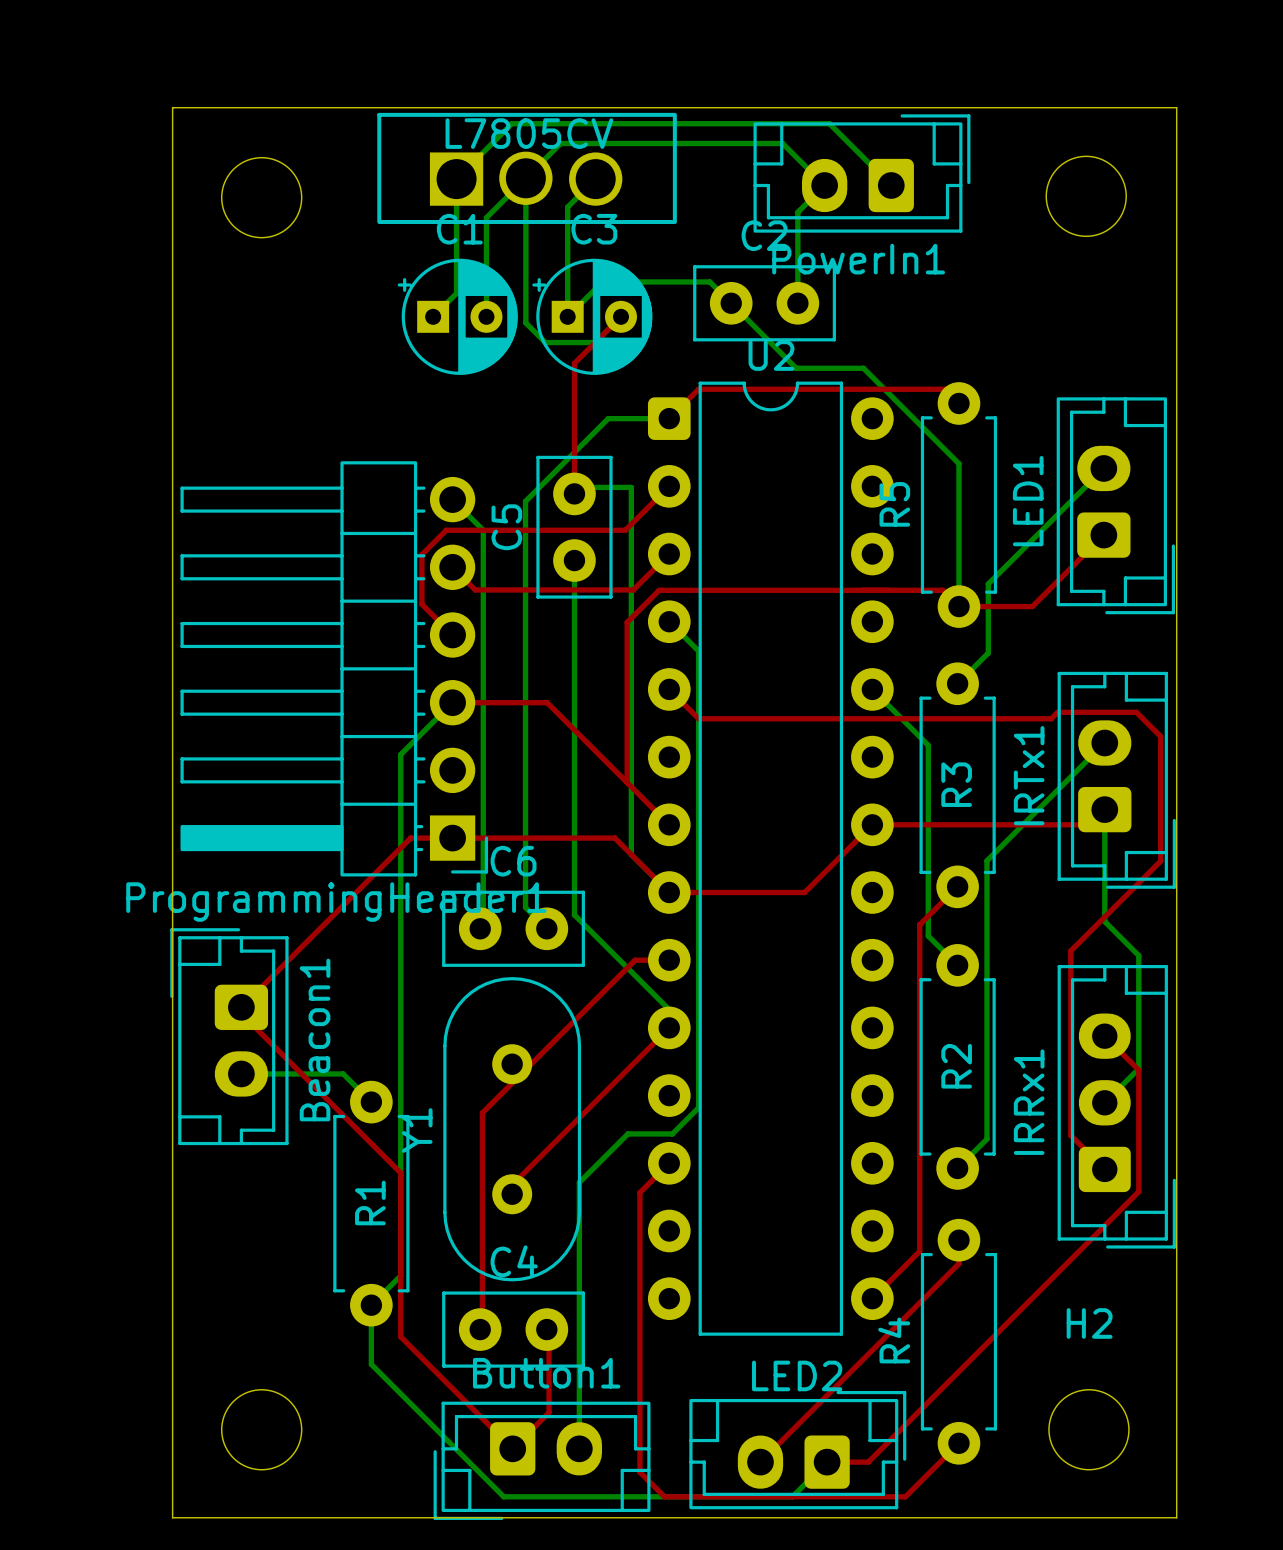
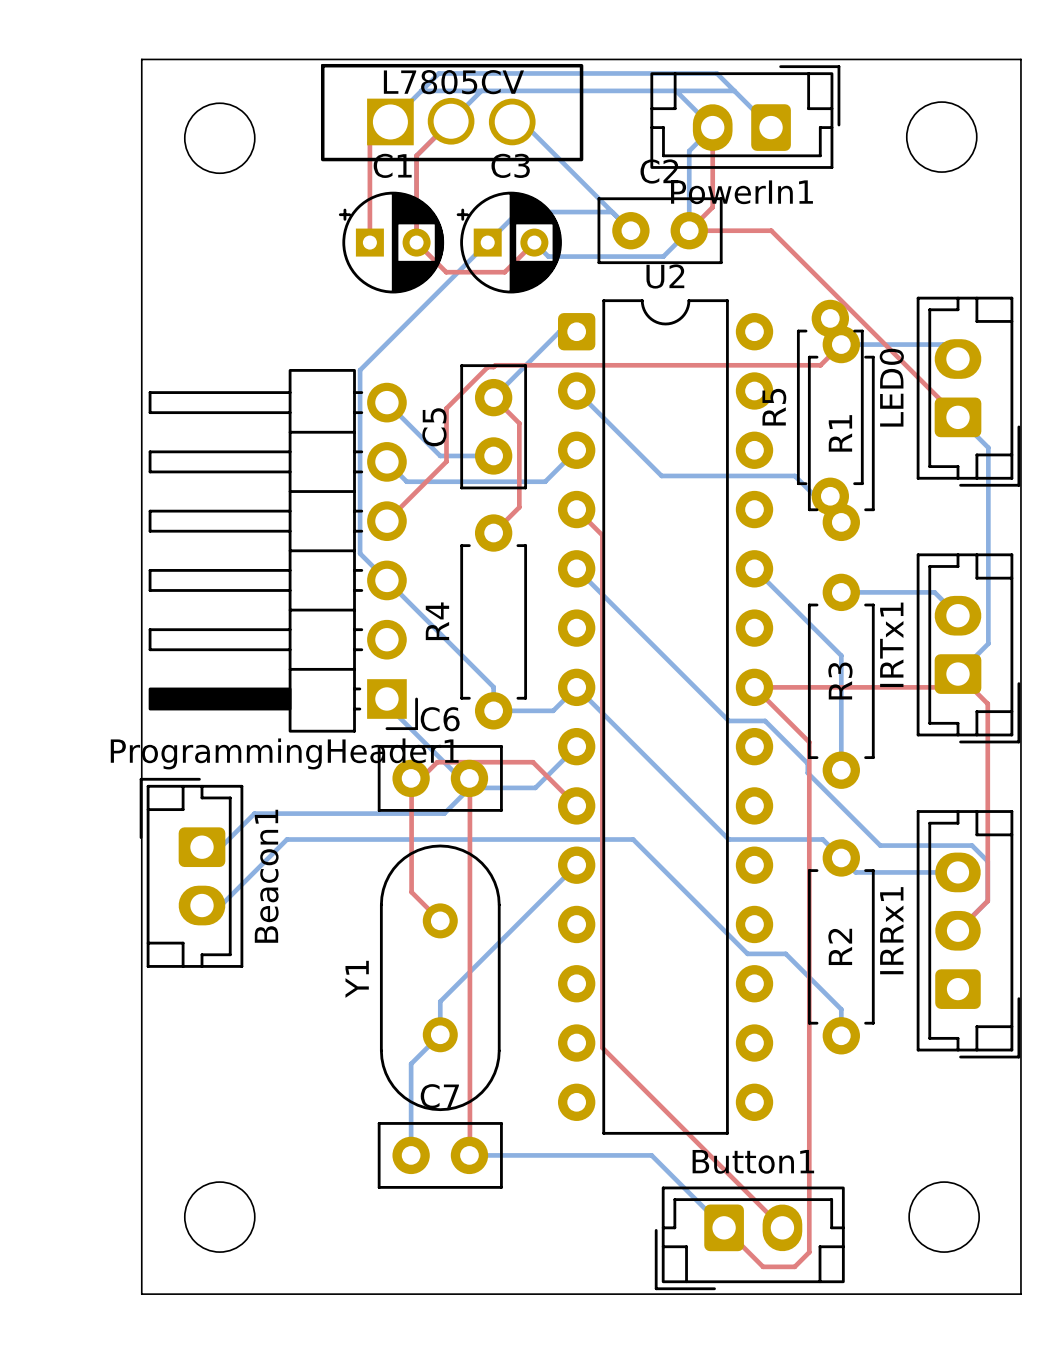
top track: none -> (451, 121) (416, 155) (416, 242) (446, 272) (504, 272)
bottom track: (525, 178) (525, 323) (545, 342) (595, 342) (620, 316) -> (689, 230) (663, 256) (548, 256) (534, 242)
top track: none -> (390, 121) (369, 142) (369, 242)
bottom track: (456, 179) (456, 293) (433, 316) -> none
bottom track: (595, 179) (567, 207) (567, 316) -> (512, 121) (522, 121) (612, 212)
top track: none -> (712, 127) (712, 207) (689, 230) (771, 230) (958, 417)
bottom track: (731, 303) (796, 368) (863, 368) (958, 463) (958, 606) -> none
top track: (587, 350) (574, 363) (574, 493) -> (493, 533) (519, 507) (519, 423) (493, 397)
top track: (958, 403) (944, 389) (698, 389) (669, 418) -> none
bottom track: (649, 418) (608, 418) (525, 501) (525, 907) (546, 928) -> (559, 331) (499, 391)
bottom track: none -> (841, 344) (943, 344) (958, 359)
bottom track: (1103, 468) (988, 583) (988, 653) (957, 683) -> none
top track: (669, 486) (625, 530) (446, 530) (421, 554) (421, 604) (452, 635) -> (841, 344) (820, 365) (495, 365) (487, 367) (446, 408) (446, 461) (386, 521)
bottom track: none -> (576, 390) (661, 475) (794, 475) (841, 522)
bottom track: (580, 487) (631, 487) (631, 854) (669, 892) -> (469, 787) (535, 787) (576, 746)
LED1 name: LED1 (1028, 501) -> LED0 (891, 387)
LED1 position: (1115, 505) -> (968, 391)
bottom track: none -> (958, 417) (988, 447) (988, 643) (958, 674)
bottom track: (483, 530) (483, 925) (480, 928) -> (413, 429) (440, 455) (493, 455)
top track: (1103, 535) (1032, 606) (958, 606) (942, 590) (659, 590) (627, 622) (627, 782) -> none
top track: (669, 554) (633, 589) (475, 589) (452, 567) -> none
bottom track: none -> (576, 450) (545, 481) (406, 481) (386, 461)
bottom track: (574, 560) (574, 824) -> (487, 242) (360, 370) (360, 553) (493, 687)
top track: none -> (576, 509) (602, 535) (602, 1047) (782, 1227)
bottom track: (669, 621) (698, 651) (698, 1107) (672, 1133) (627, 1133) (579, 1182) (579, 1448) -> none
top track: (669, 689) (698, 718) (1051, 718) (1057, 712) (1136, 712) (1160, 736) (1160, 861) (1070, 951) (1070, 1135) (1104, 1169) -> none
top track: (452, 702) (547, 702) (669, 824) (677, 824) -> none
bottom track: (452, 702) (400, 754) (400, 1275) (371, 1305) (371, 1364) (503, 1496) (792, 1496) (827, 1462) (837, 1472) -> none
bottom track: (1104, 742) (986, 860) (986, 1139) (957, 1168) -> (958, 615) (934, 592) (841, 592)
bottom track: (928, 745) (928, 936) (957, 965) -> (803, 617) (841, 655) (841, 770)
R3 position: (957, 785) -> (841, 681)
top track: none -> (958, 674) (987, 703) (987, 901) (958, 930)
bottom track: (1104, 809) (1104, 921) (1138, 955) (1138, 1023) -> (576, 568) (728, 720) (765, 720) (807, 763) (807, 773) (880, 845) (972, 845) (987, 861)
top track: (872, 824) (804, 892) (669, 892) (614, 838) (410, 838) (241, 1007) (241, 1013) (400, 1172) (400, 1336) (512, 1448) (549, 1412) (549, 1336) -> (754, 687) (809, 742) (809, 1252) (794, 1266) (763, 1266) (724, 1227)
bottom track: none -> (386, 698) (386, 704) (469, 787)
bottom track: (574, 851) (574, 914) (669, 1009) (669, 1027) -> (493, 710) (553, 710) (576, 687) (728, 839) (822, 839) (855, 872) (958, 872)
top track: (957, 886) (919, 924) (919, 1251) (872, 1298) -> none
top track: none -> (469, 787) (469, 1155)
bottom track: none -> (469, 787) (444, 813) (254, 813) (209, 859)
top track: (669, 960) (635, 960) (482, 1112) (482, 1336) -> (576, 805) (532, 762) (437, 762) (411, 787) (411, 892) (440, 920)
top track: (669, 1027) (516, 1180) (516, 1209) -> none
bottom track: none -> (576, 865) (440, 1001) (440, 1034) (411, 1063) (411, 1155)
top track: (1104, 1036) (1138, 1070) (1138, 1191) (868, 1462) (827, 1462) -> none
R2 position: (957, 1066) -> (841, 946)
bottom track: (241, 1073) (343, 1073) (371, 1102) -> none
bottom track: none -> (209, 917) (286, 839) (633, 839) (747, 953) (785, 953) (841, 1009) (841, 1035)
Y1 position: (512, 1129) -> (440, 977)
top track: (669, 1163) (639, 1192) (639, 1472) (664, 1496) (905, 1496) (958, 1443) -> none
R1 position: (371, 1203) -> (841, 433)
top track: (958, 1240) (958, 1263) (760, 1462) -> none
H2 name: H2 (1089, 1323) -> none
C4: (513, 1329) -> none
R4 position: (958, 1341) -> (493, 621)
C7: none -> (440, 1155)
bottom track: none -> (469, 1155) (651, 1155) (724, 1227)
LED2: (797, 1450) -> none
Button1 position: (542, 1460) -> (749, 1238)

